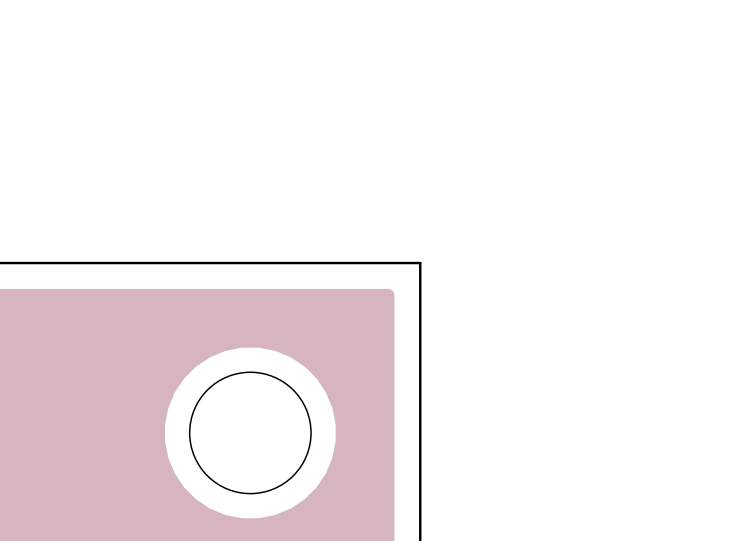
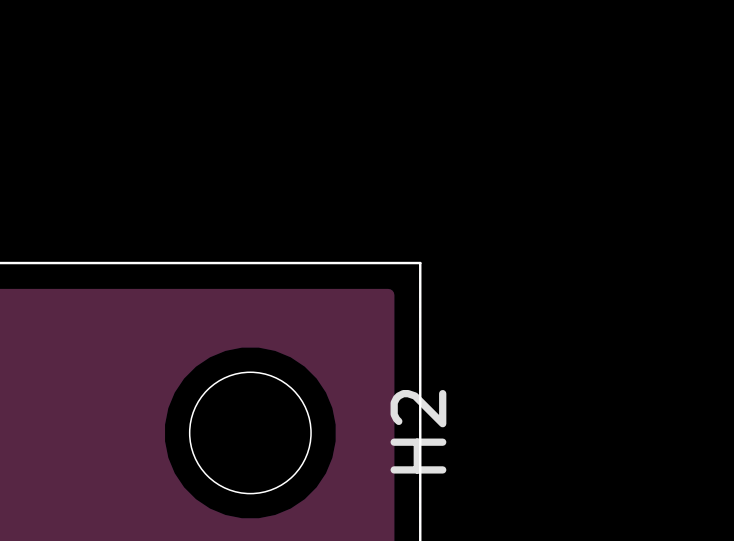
H2 name: none -> H2 (418, 431)

